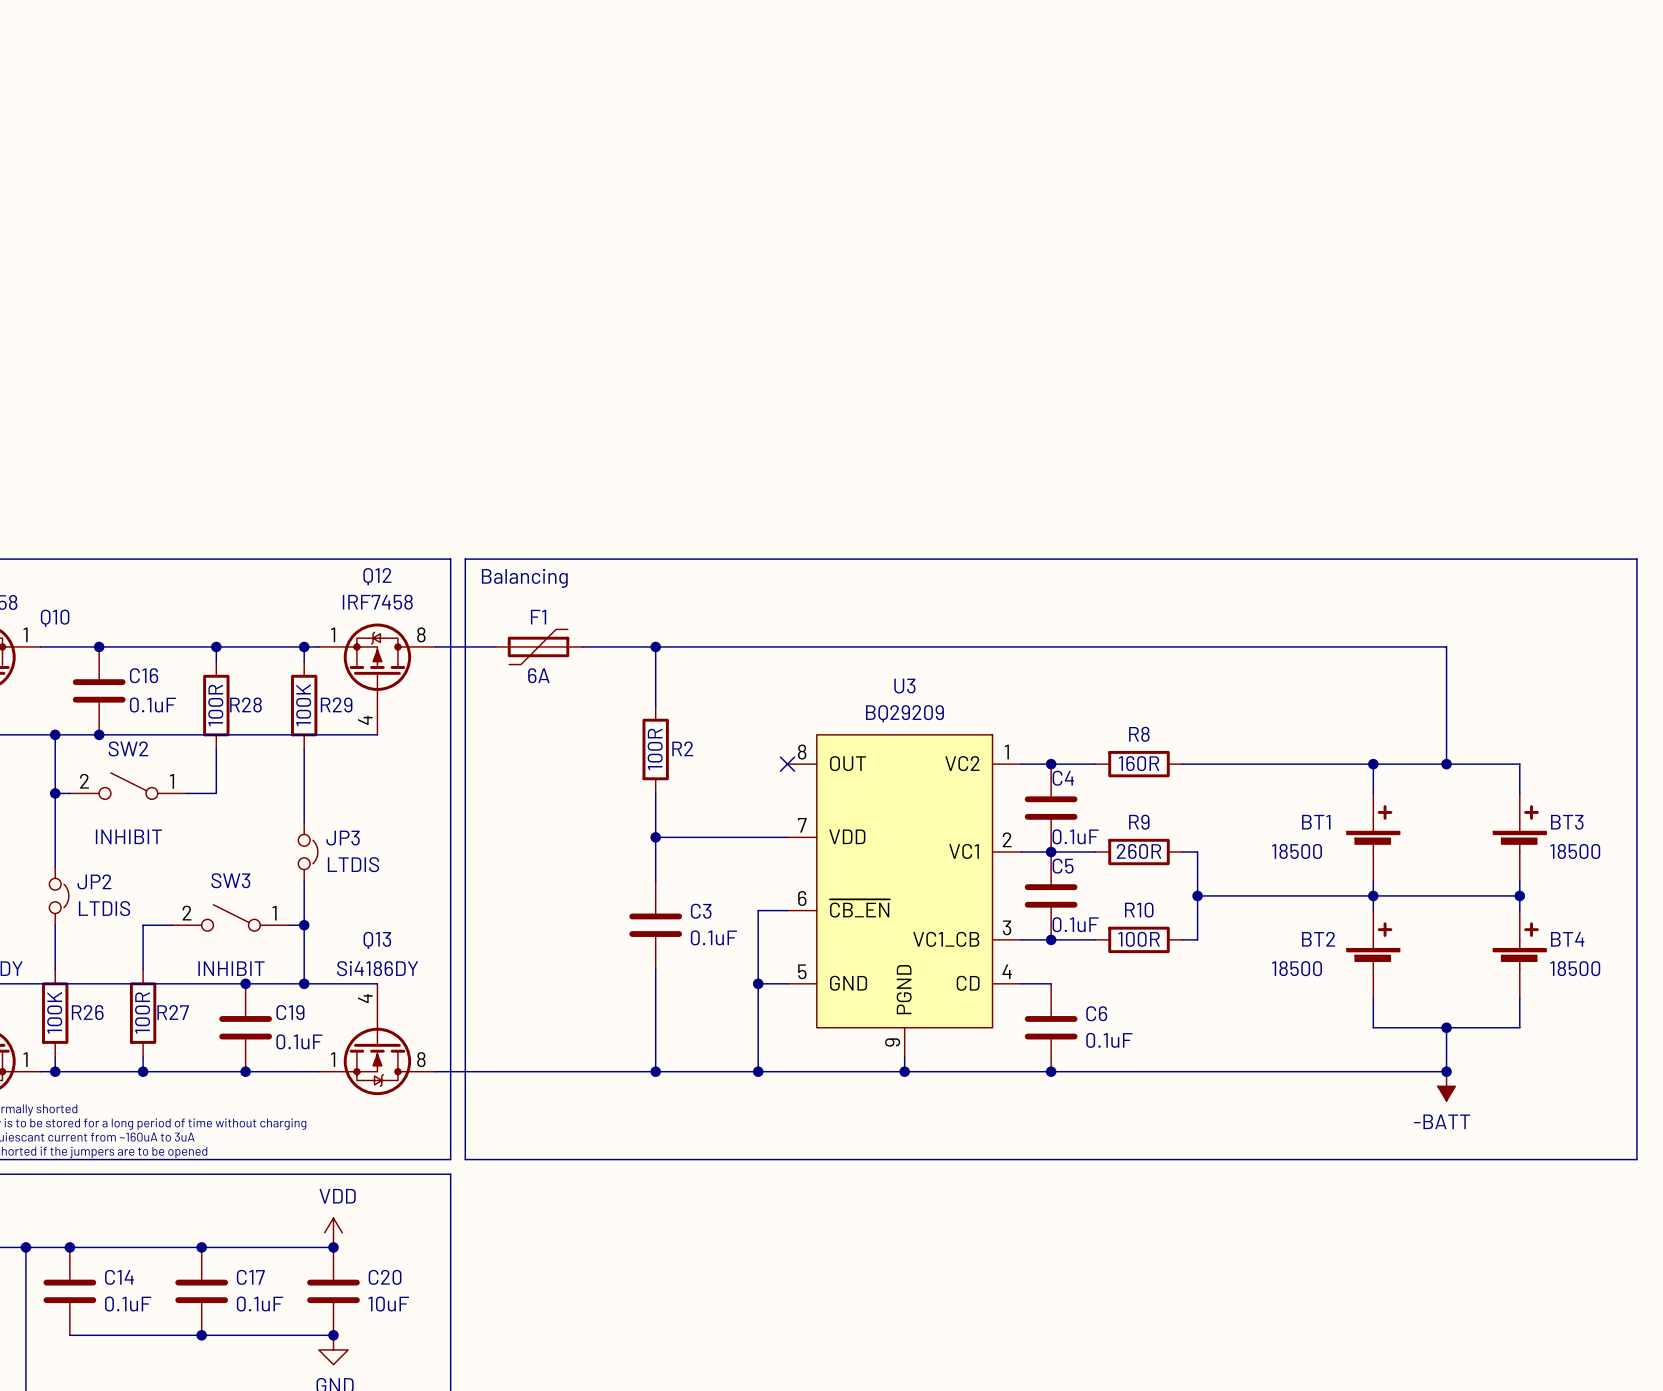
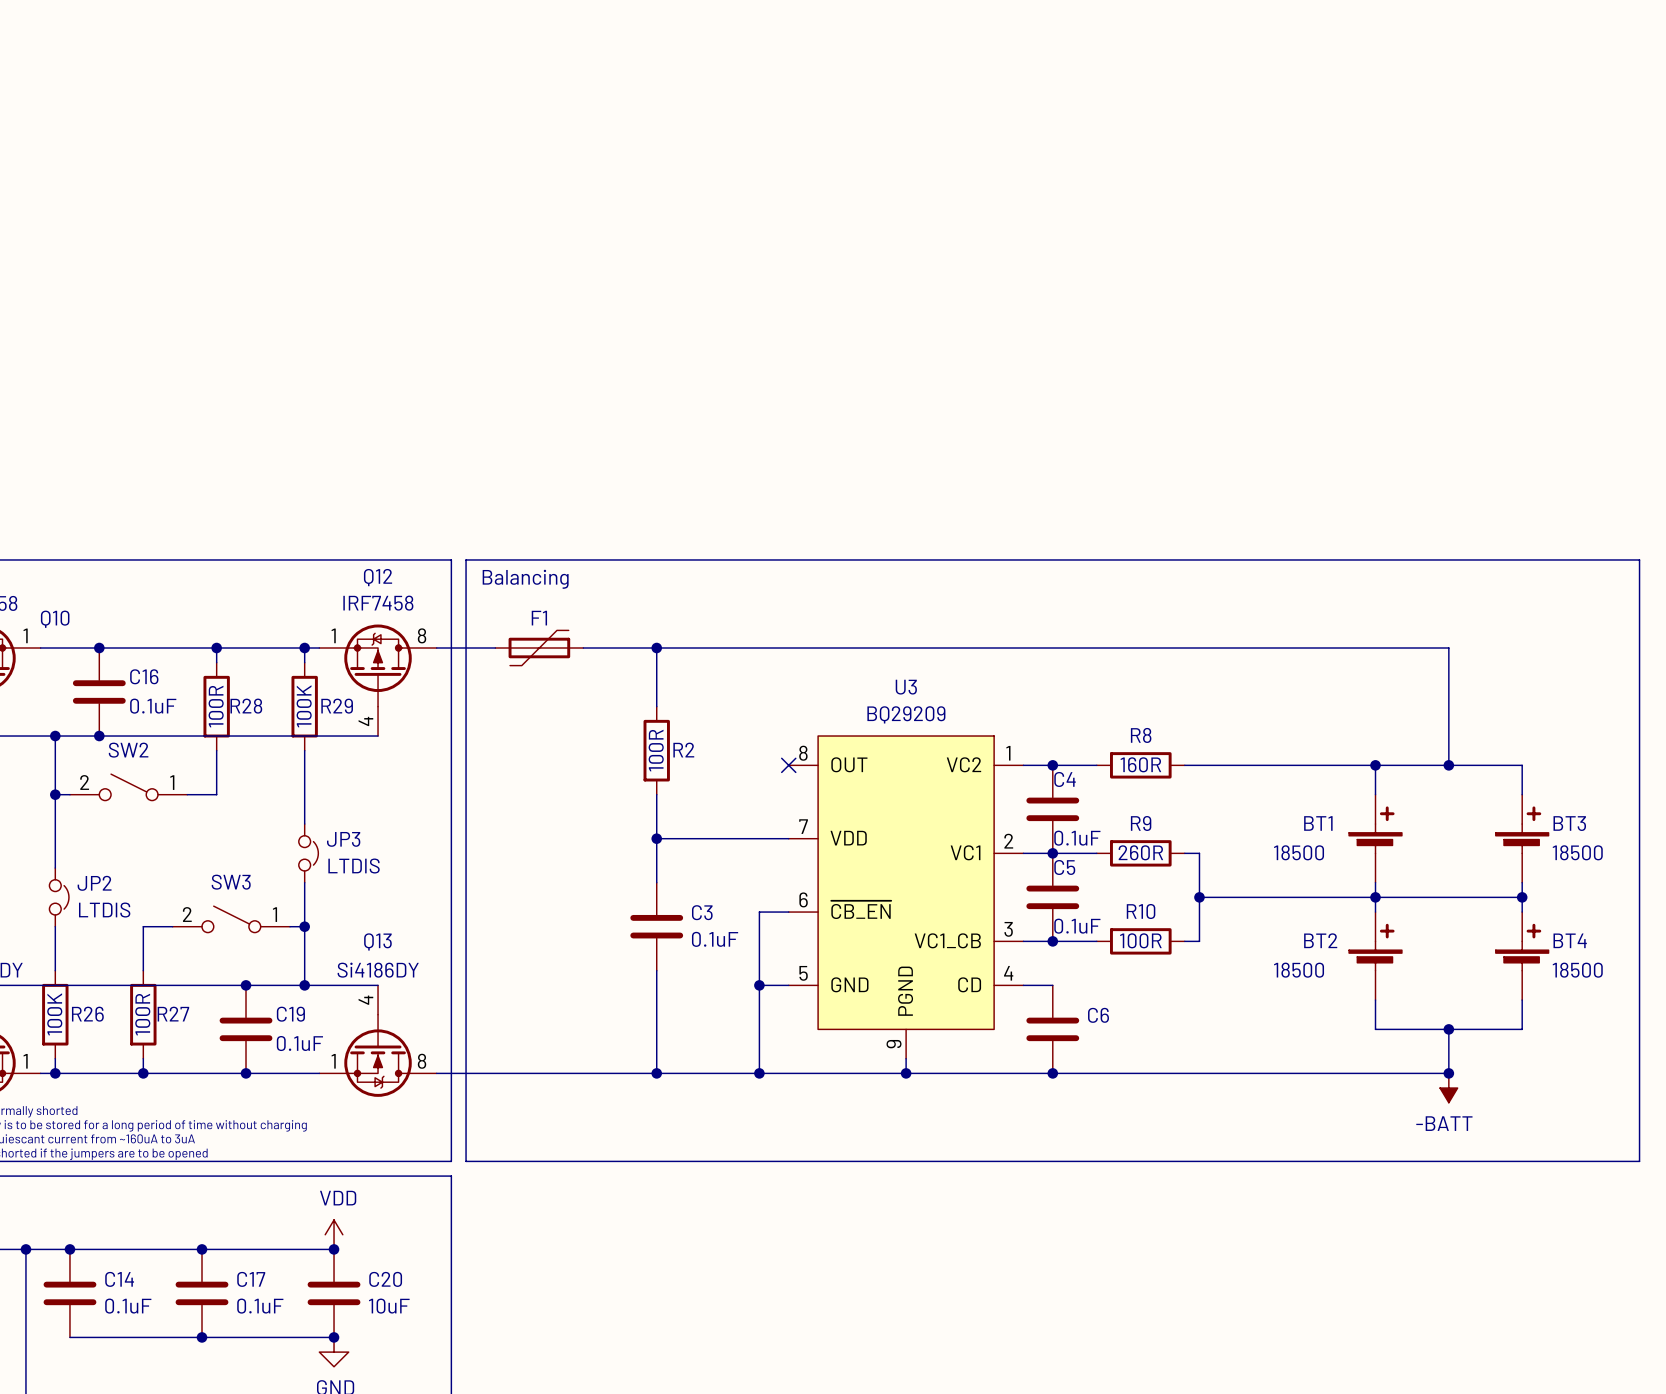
F1 value: 6A (538, 675) -> none
SW2 value: INHIBIT (128, 836) -> none
SW3 value: INHIBIT (231, 968) -> none
C6 value: 0.1uF (1109, 1040) -> none

